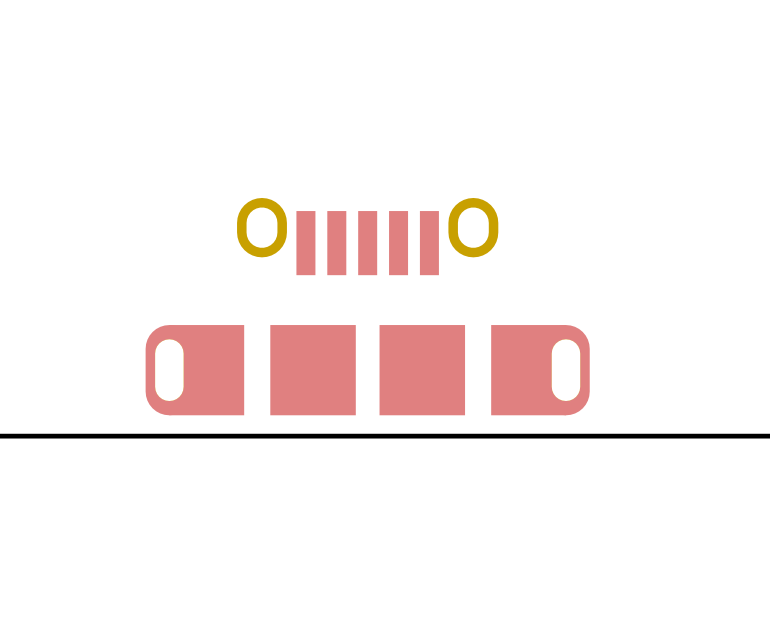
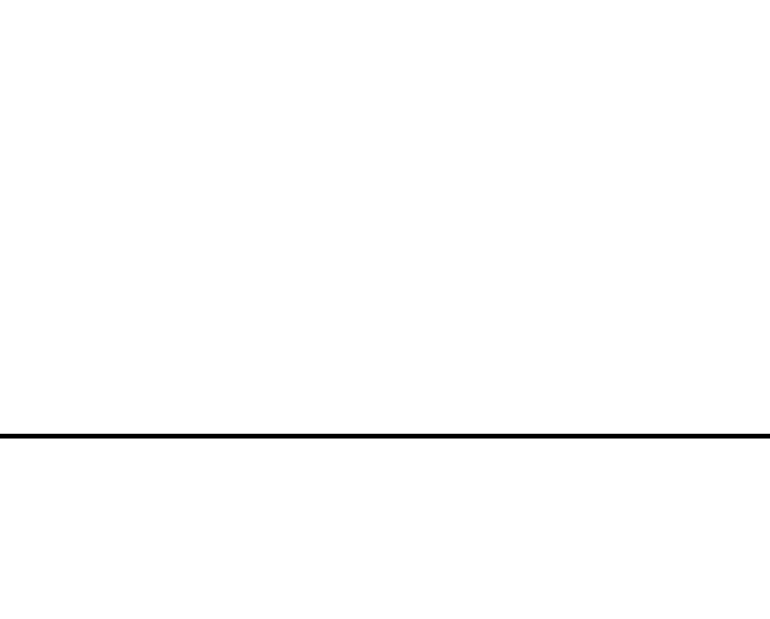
part: (367, 306) -> none

